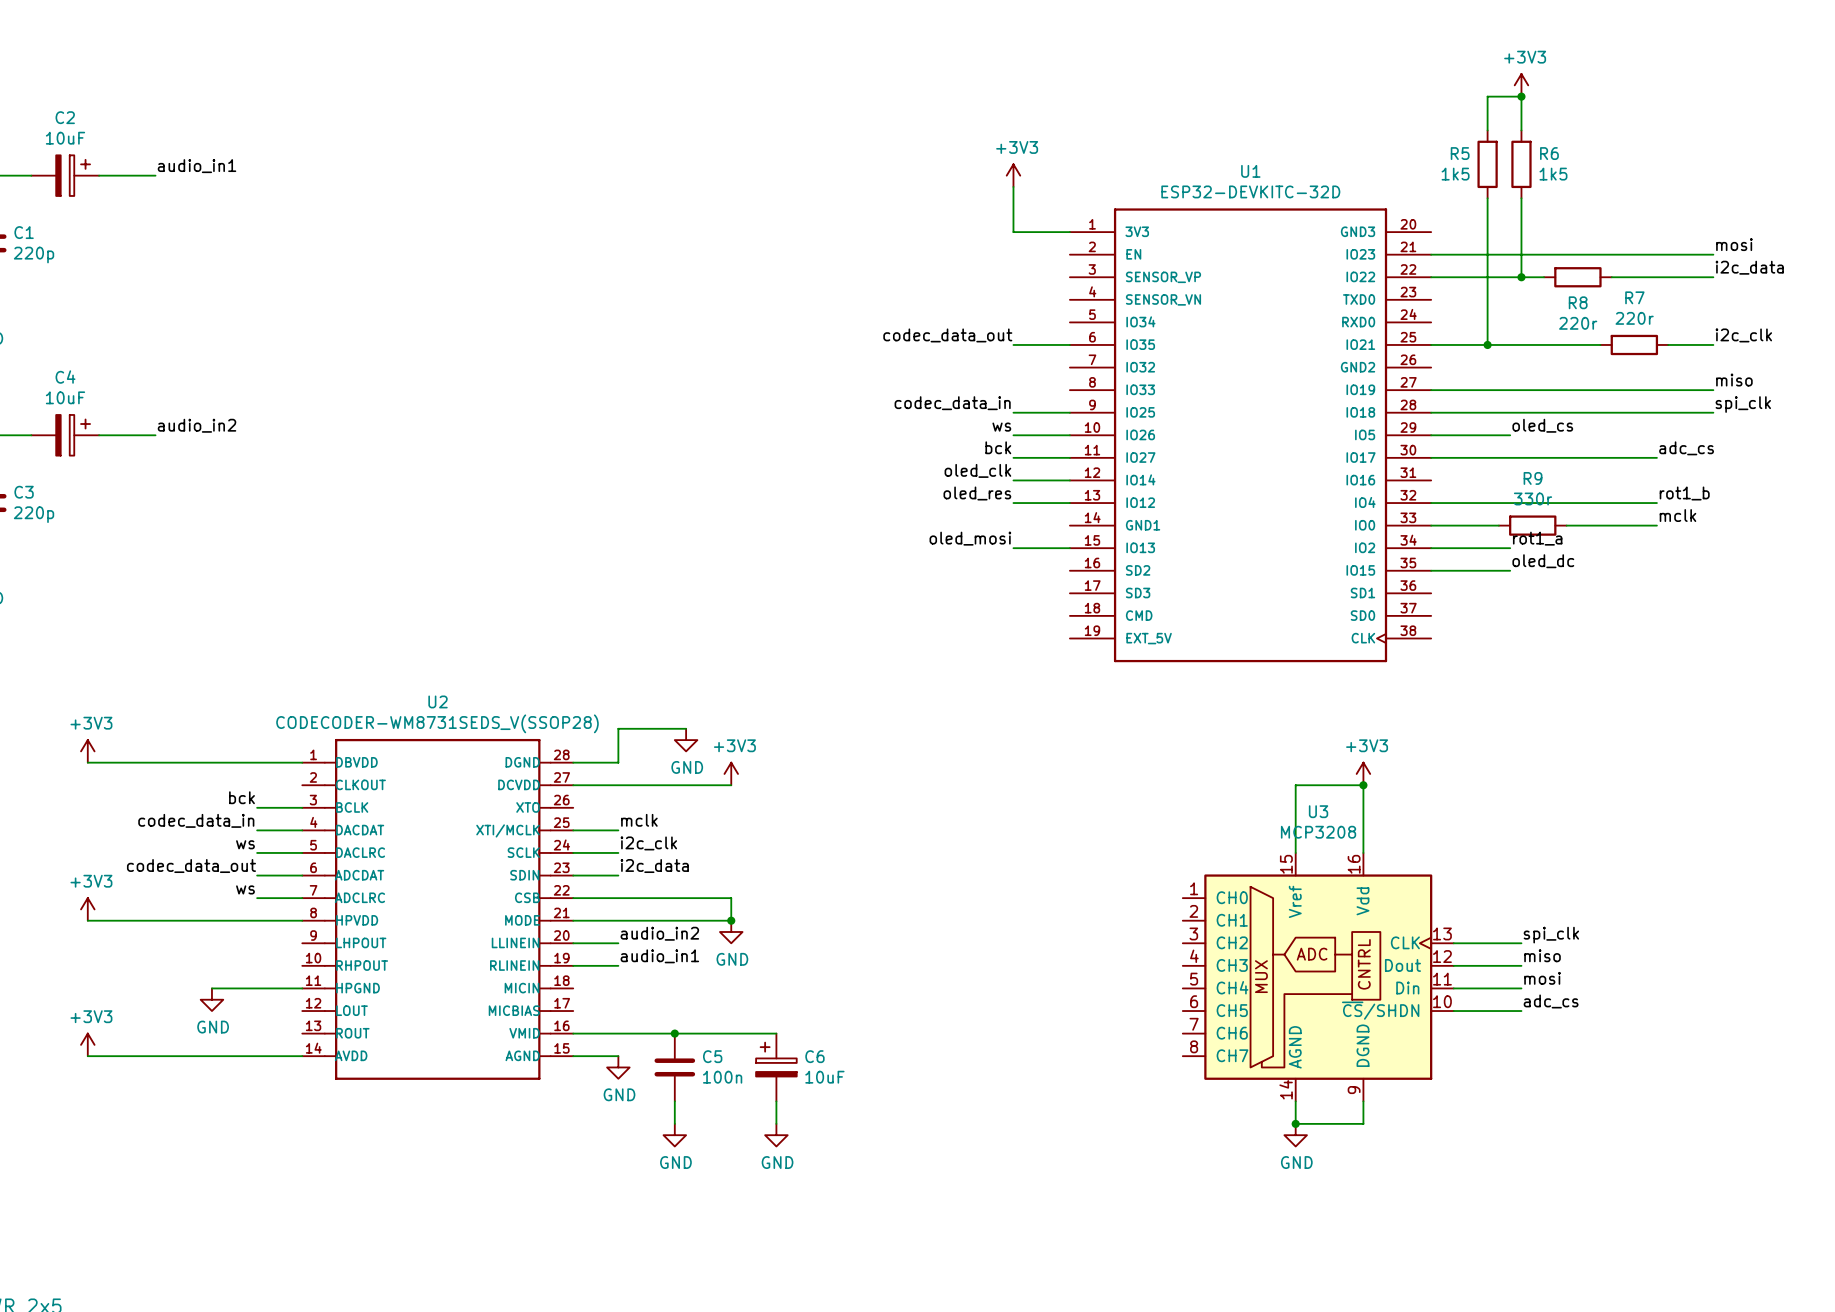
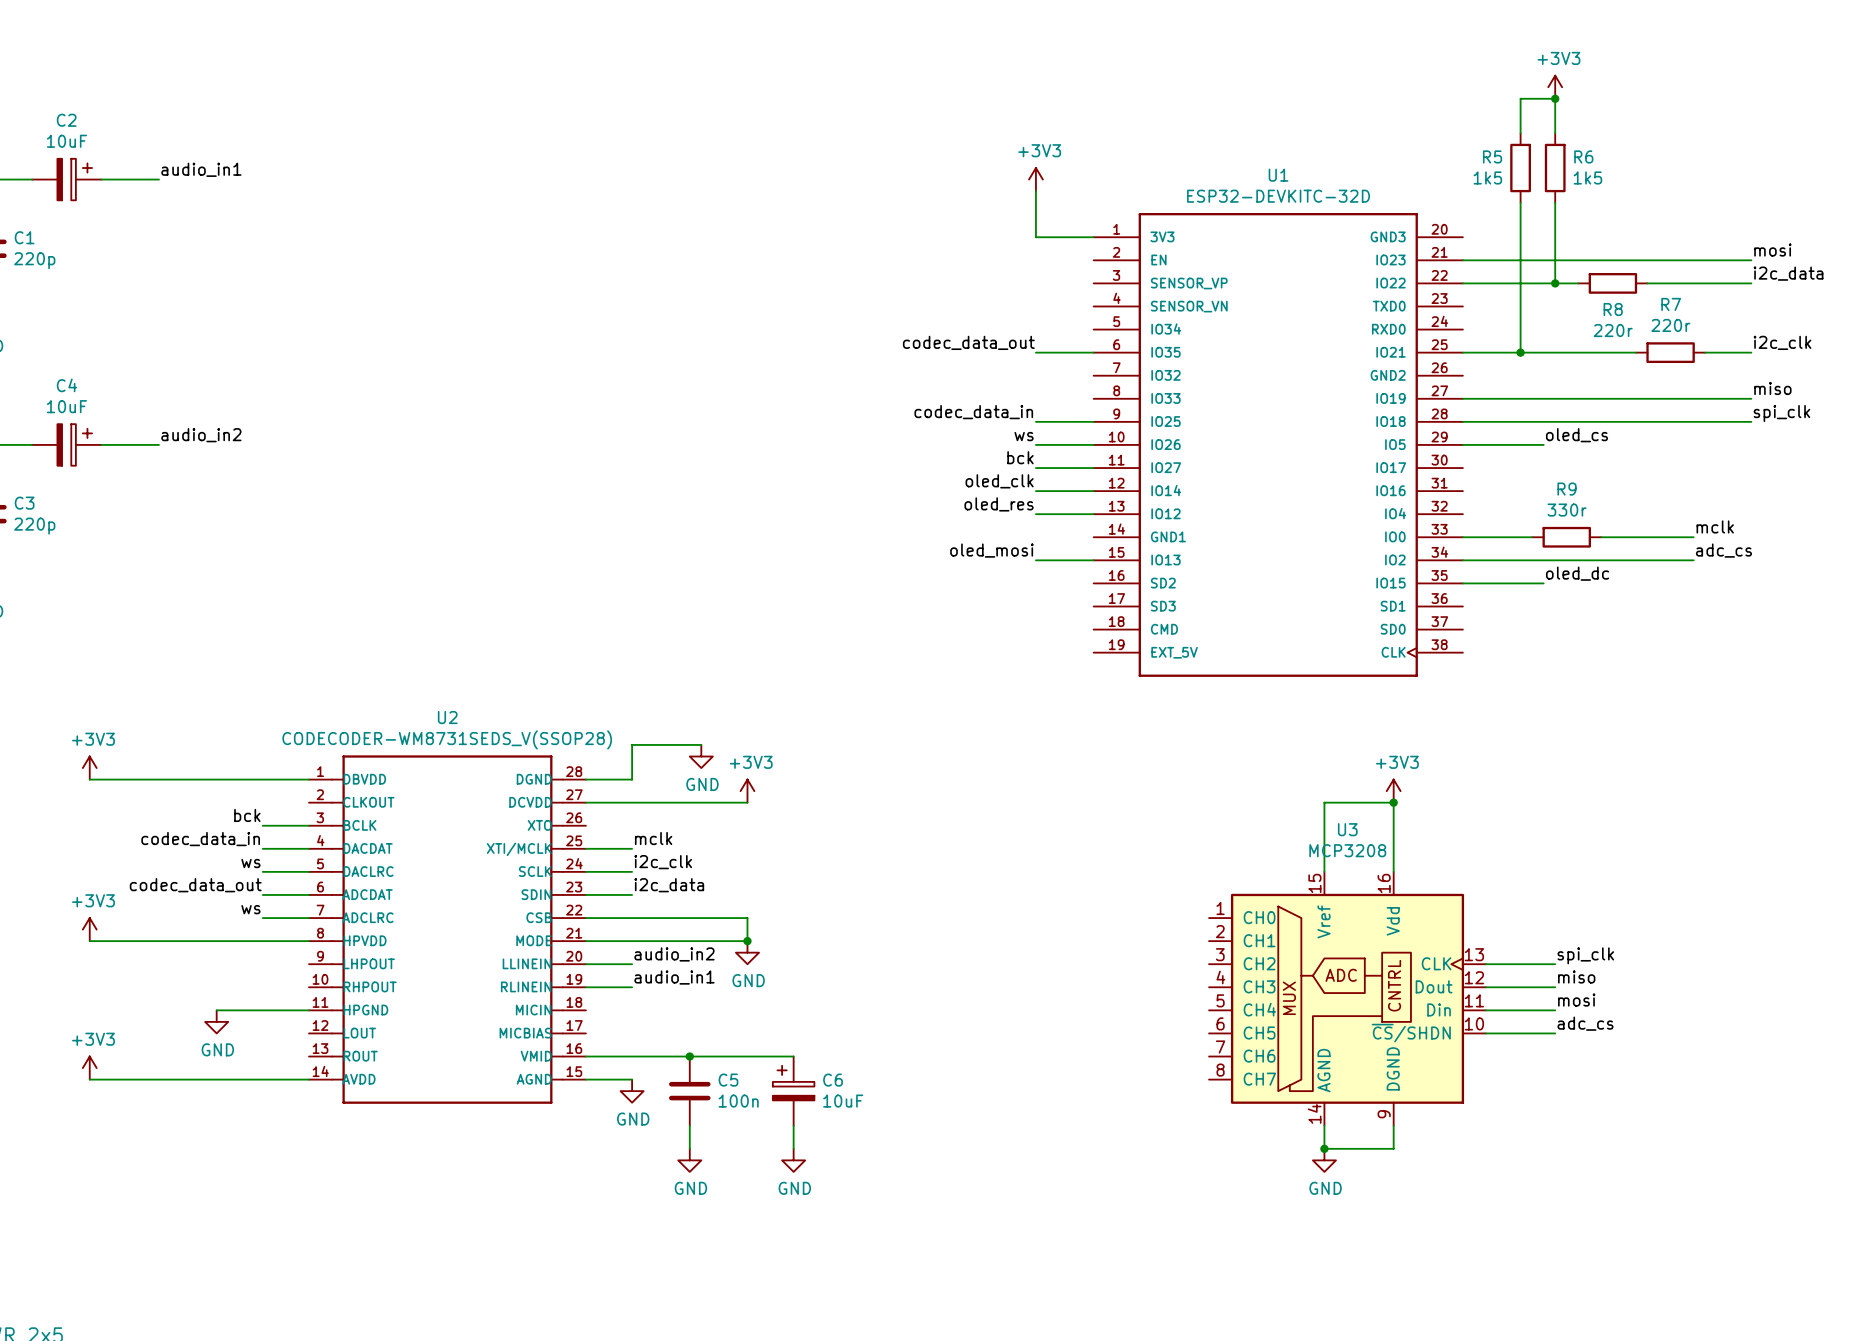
label position: adc_cs (1686, 448) -> adc_cs (1723, 550)
wire: (1431, 457) (1656, 457) -> none
label: rot1_b (1684, 493) -> none
wire: (1431, 503) (1656, 503) -> none
label: rot1_a (1537, 538) -> none
wire: none -> (1543, 560) (1693, 560)

